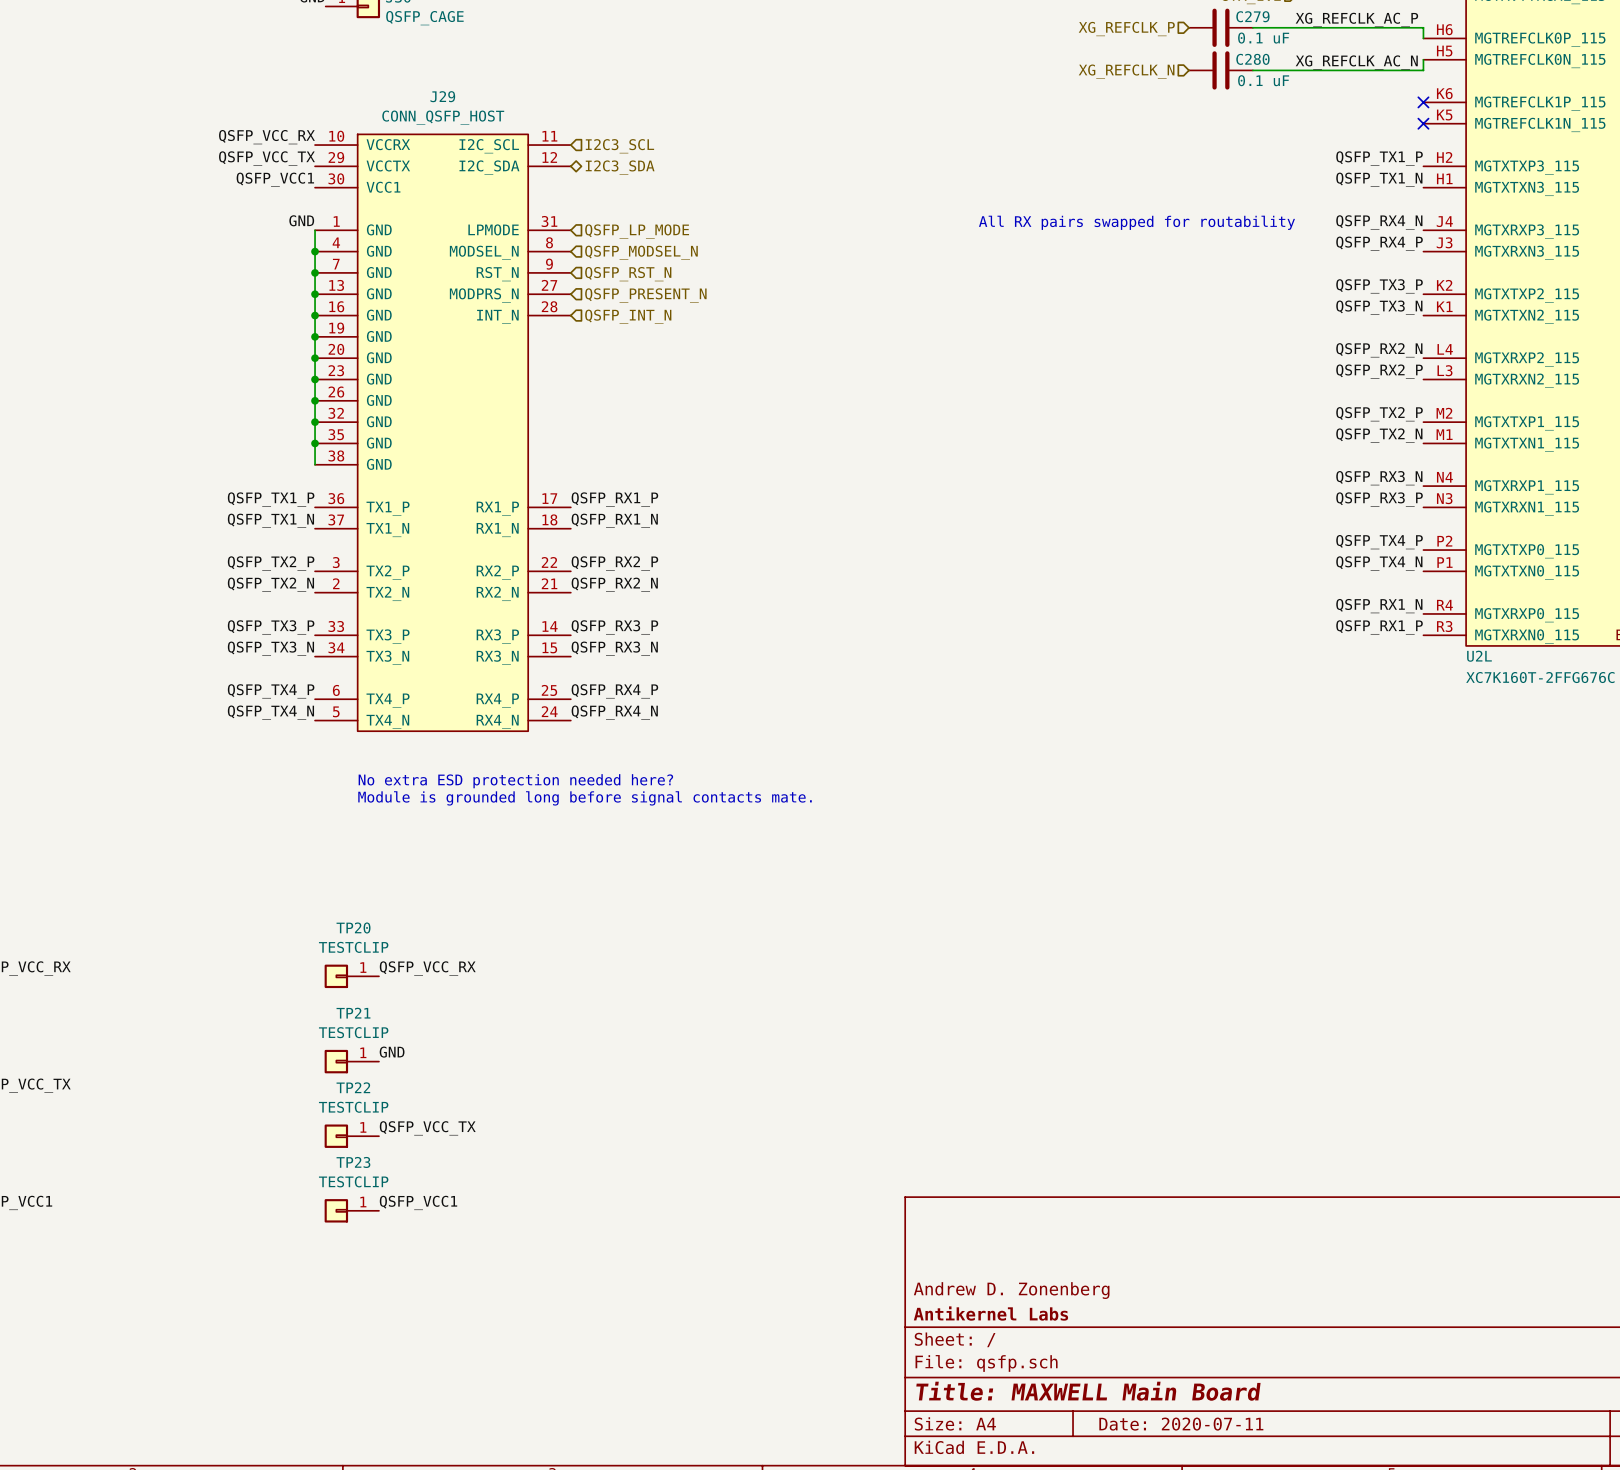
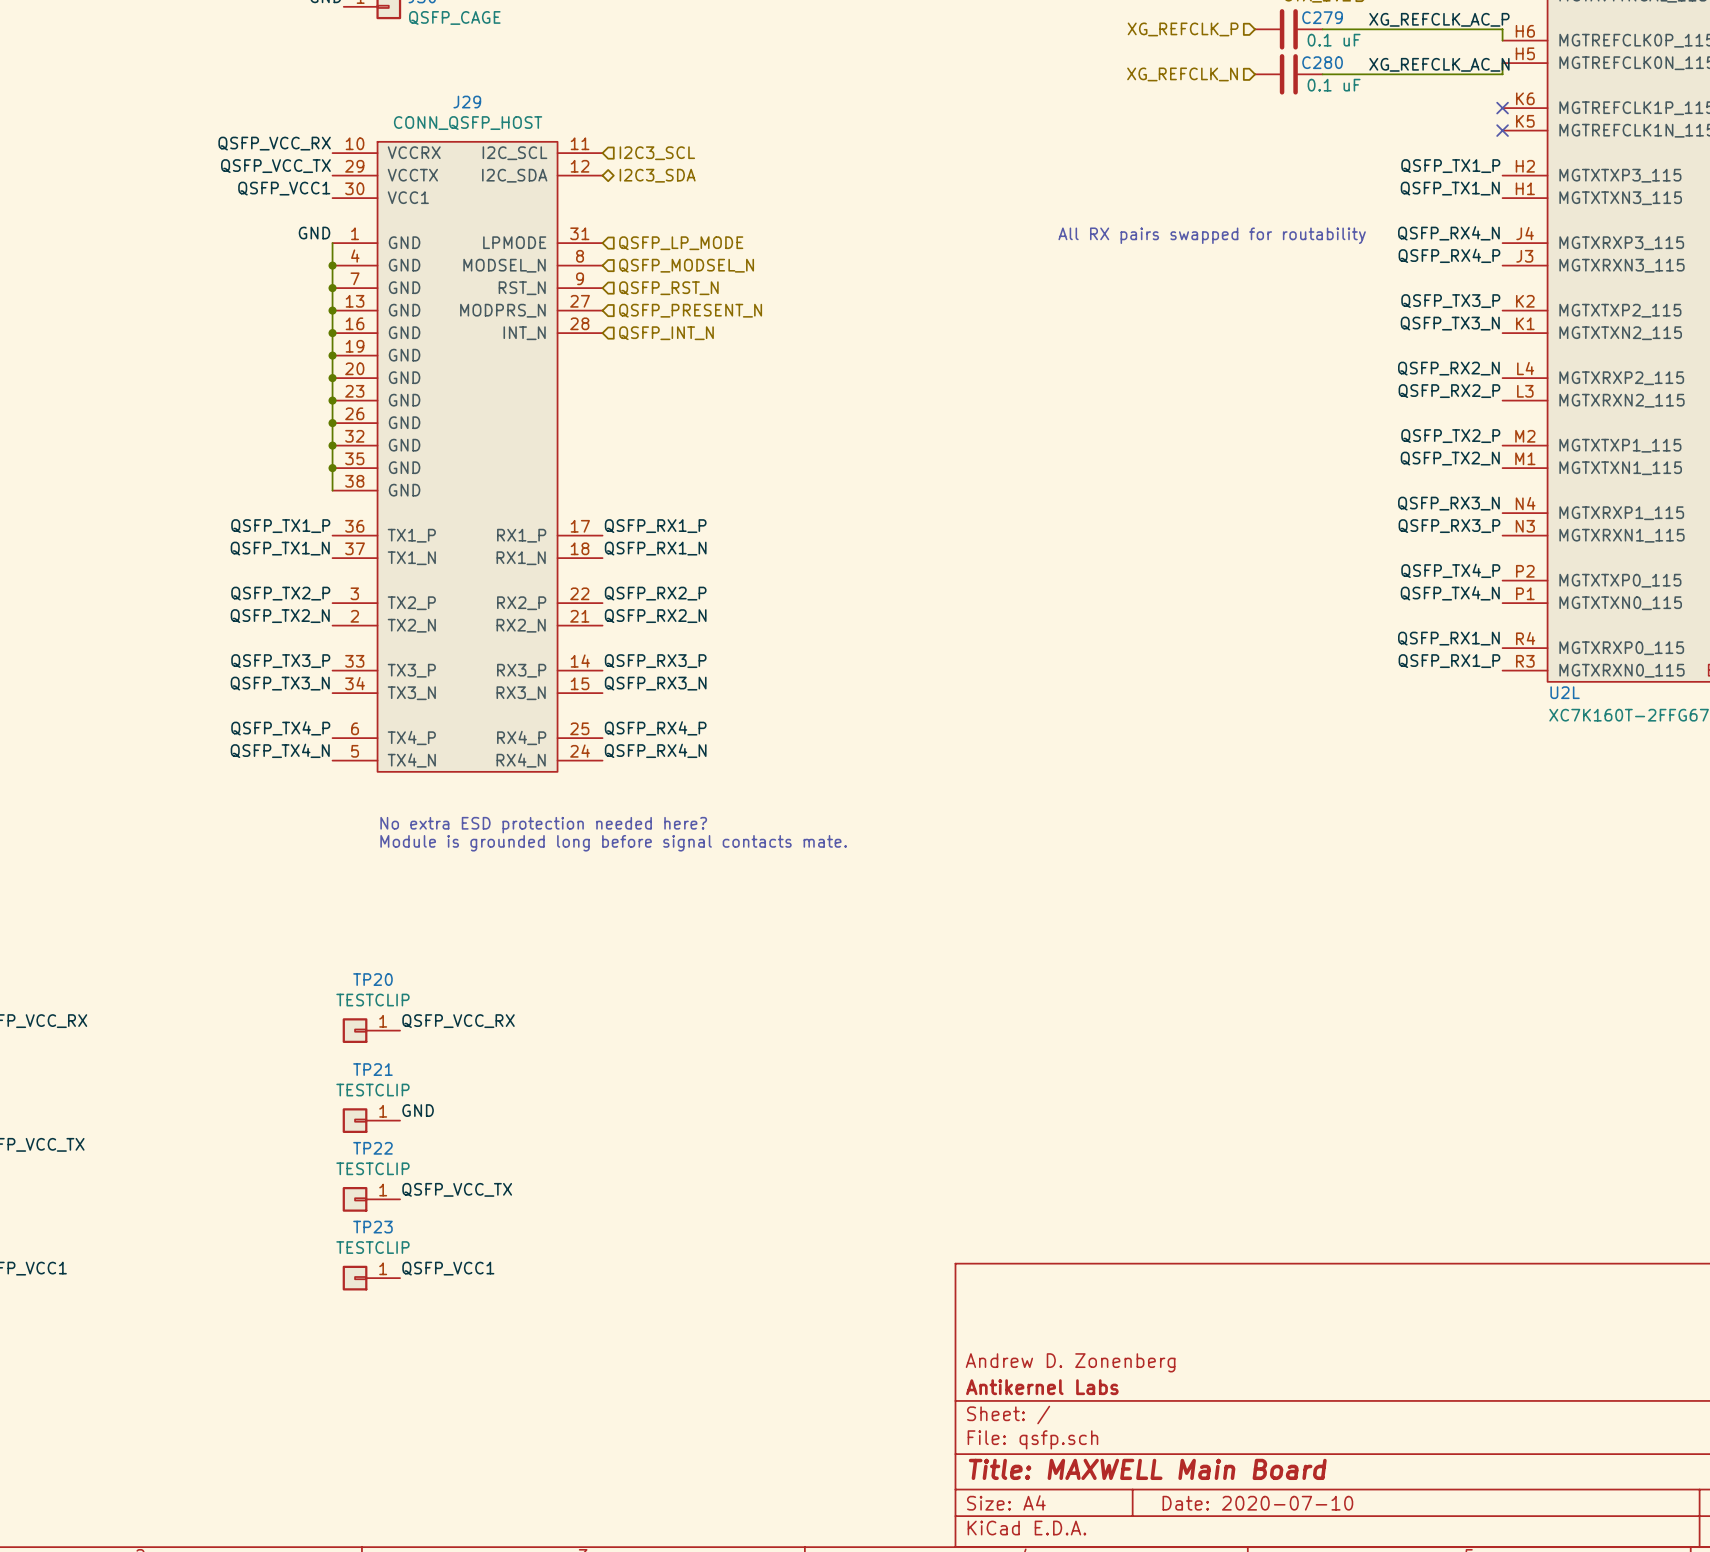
title block: Date: 2020-07-11 (1181, 1424) -> Date: 2020-07-10 (1257, 1503)

